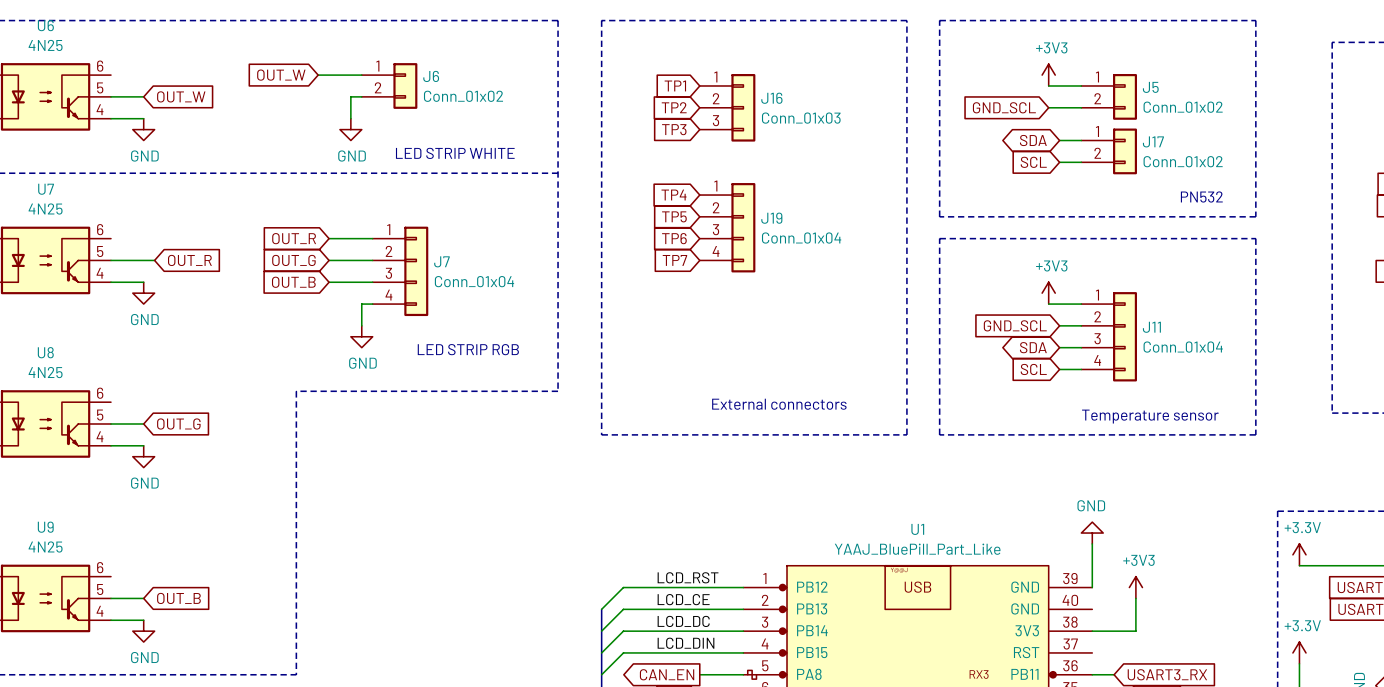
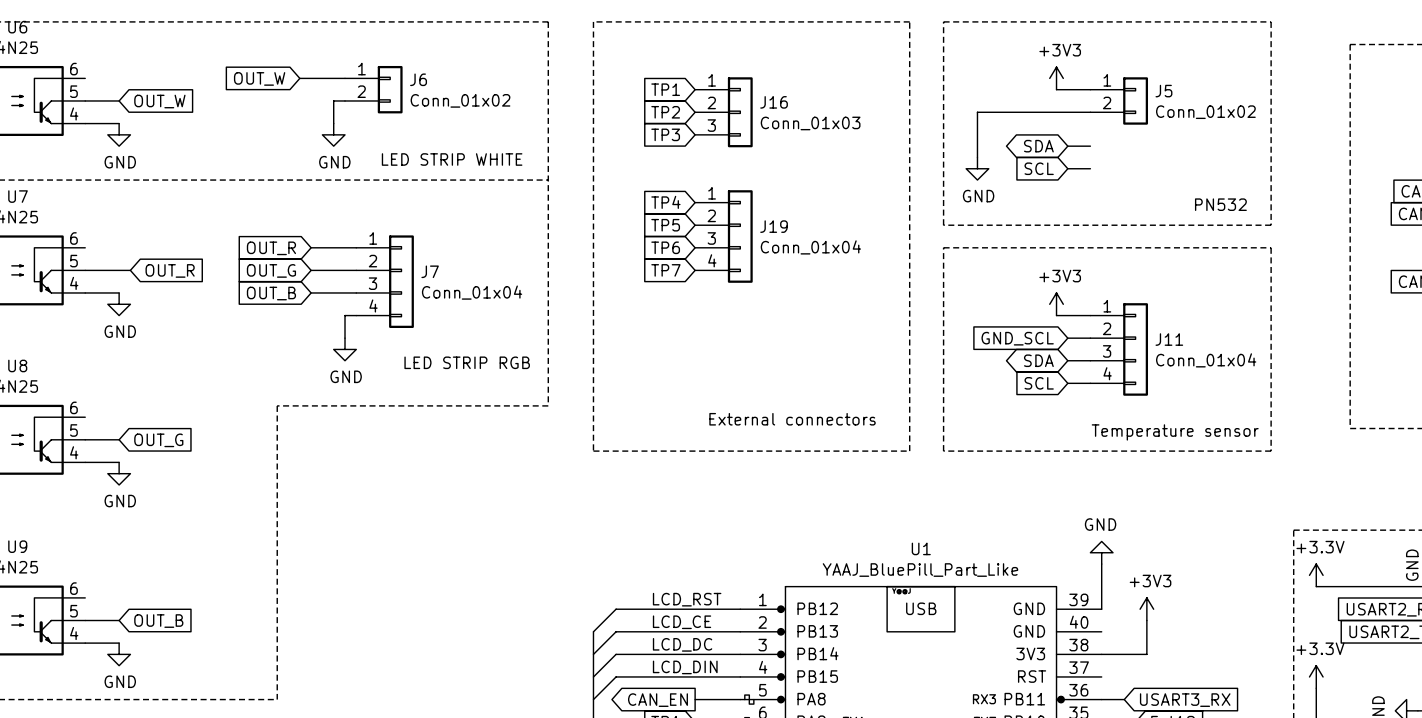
global label: GND_SCL (1004, 107) -> none
wire: none -> (1056, 112) (977, 112) (977, 157)
J17: Conn_01x02 (1109, 151) -> none
power symbol: none -> GND (977, 168)

